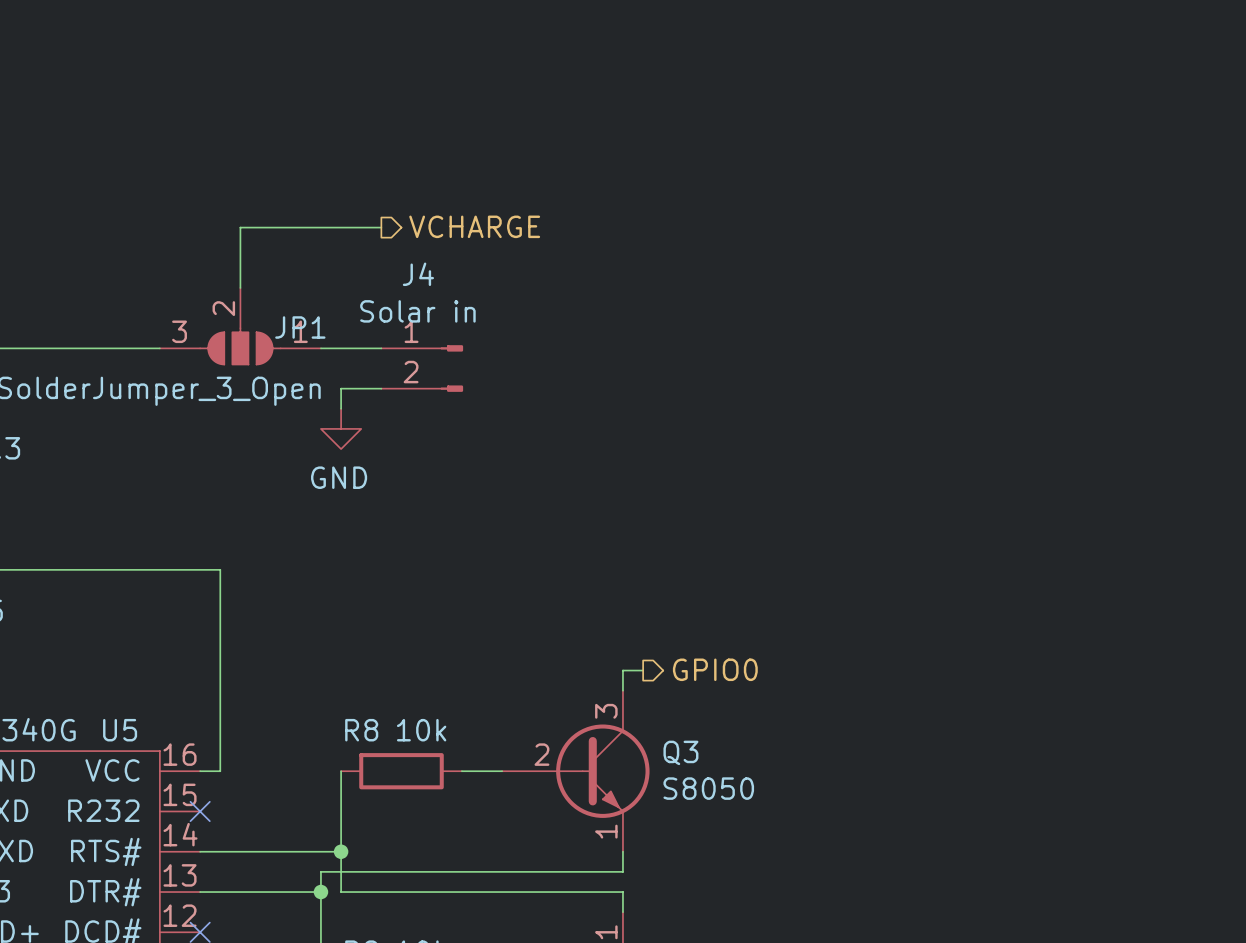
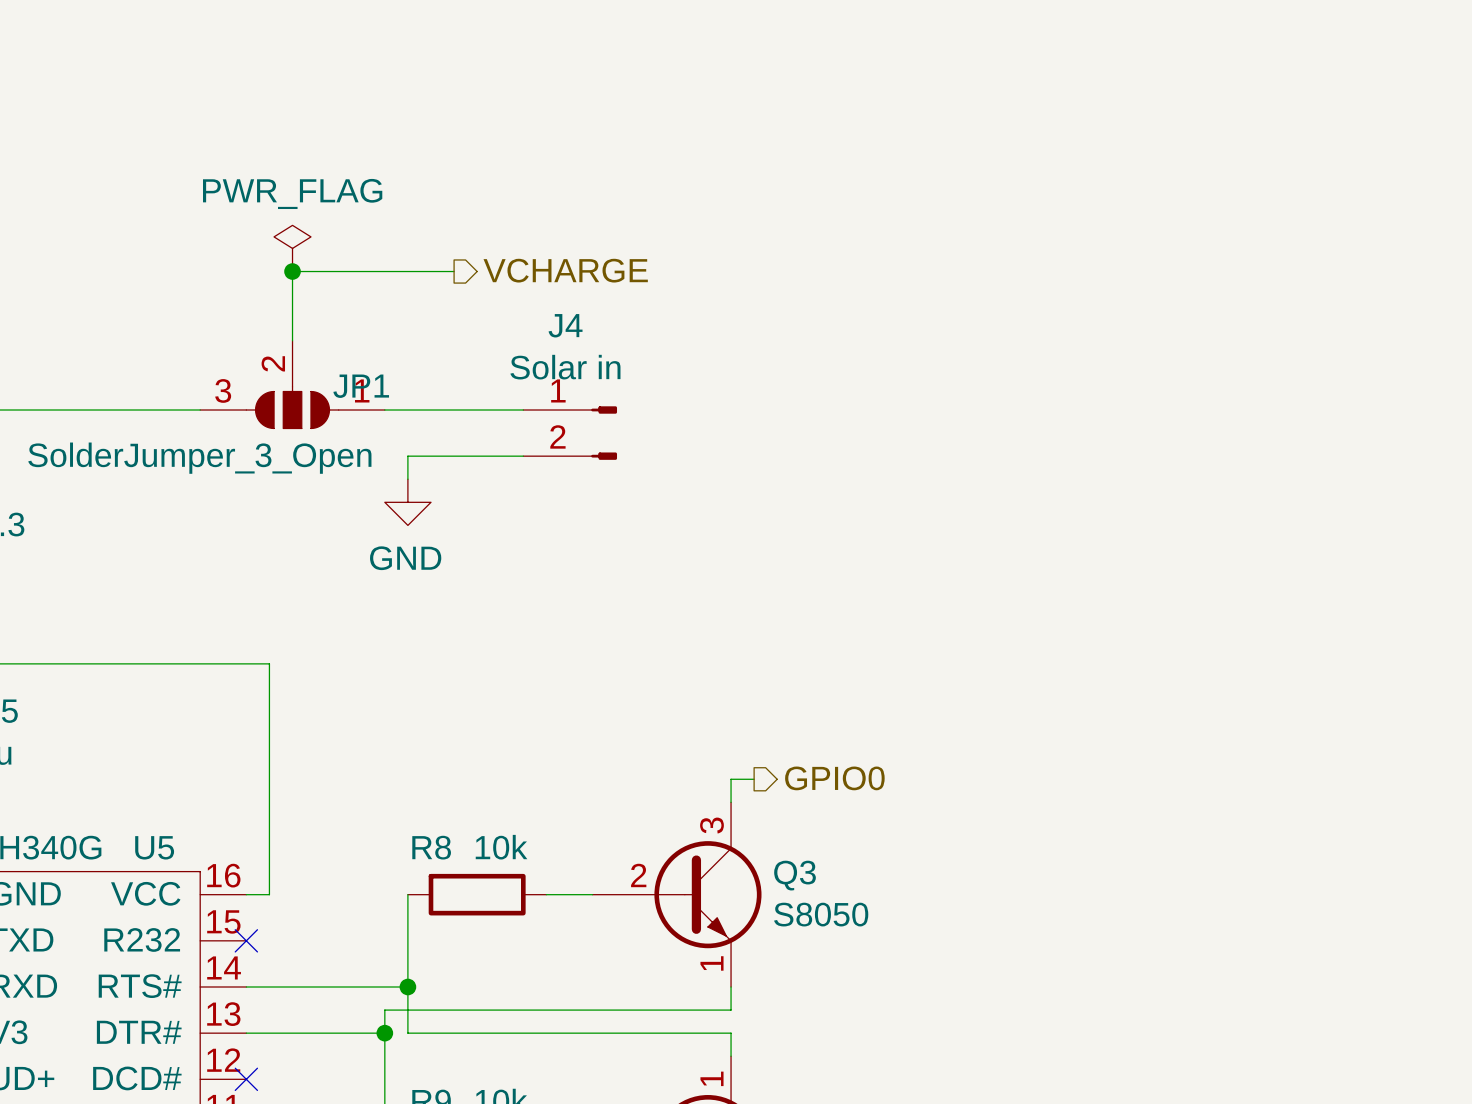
power symbol: none -> PWR_FLAG (292, 248)
junction: none -> (292, 271)
J4 position: (422, 368) -> (570, 433)

